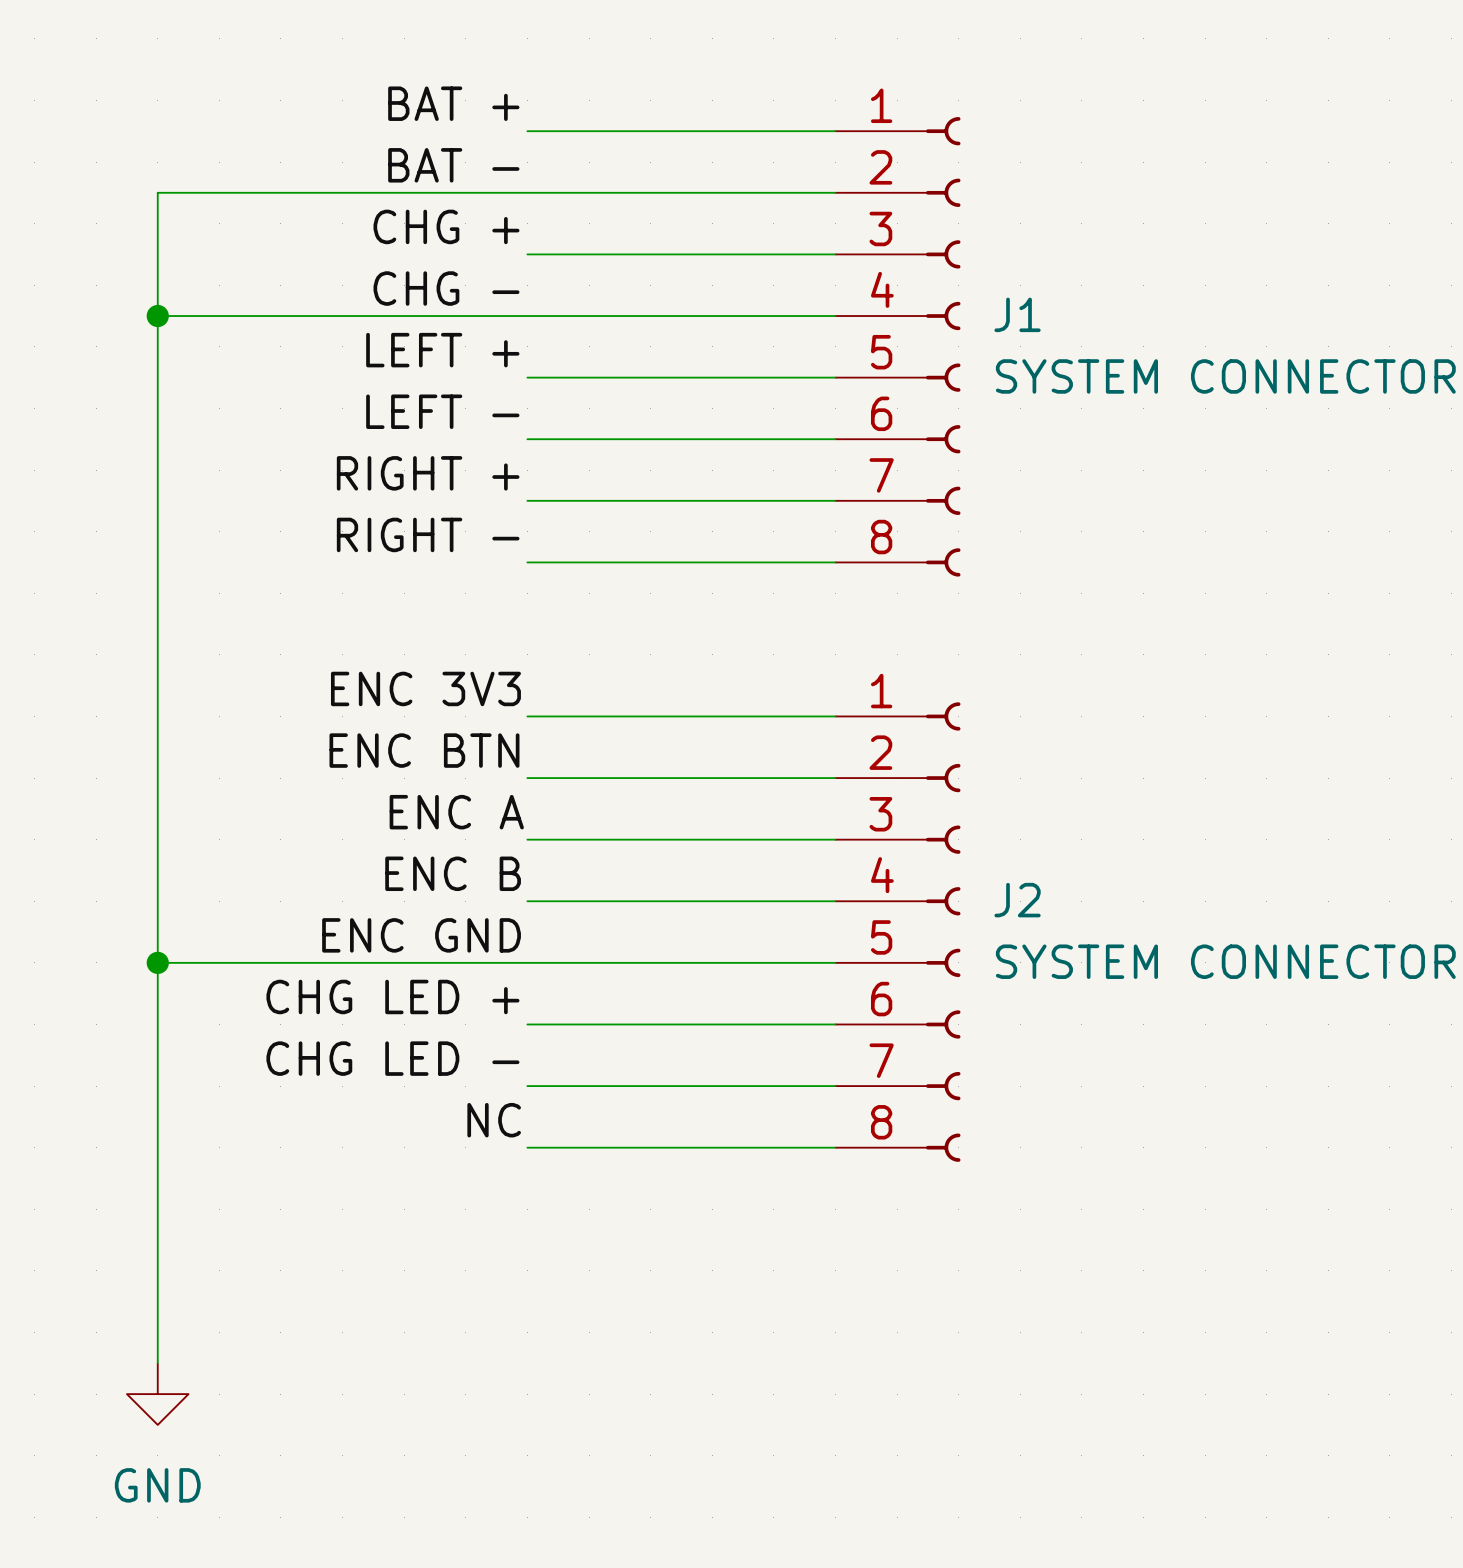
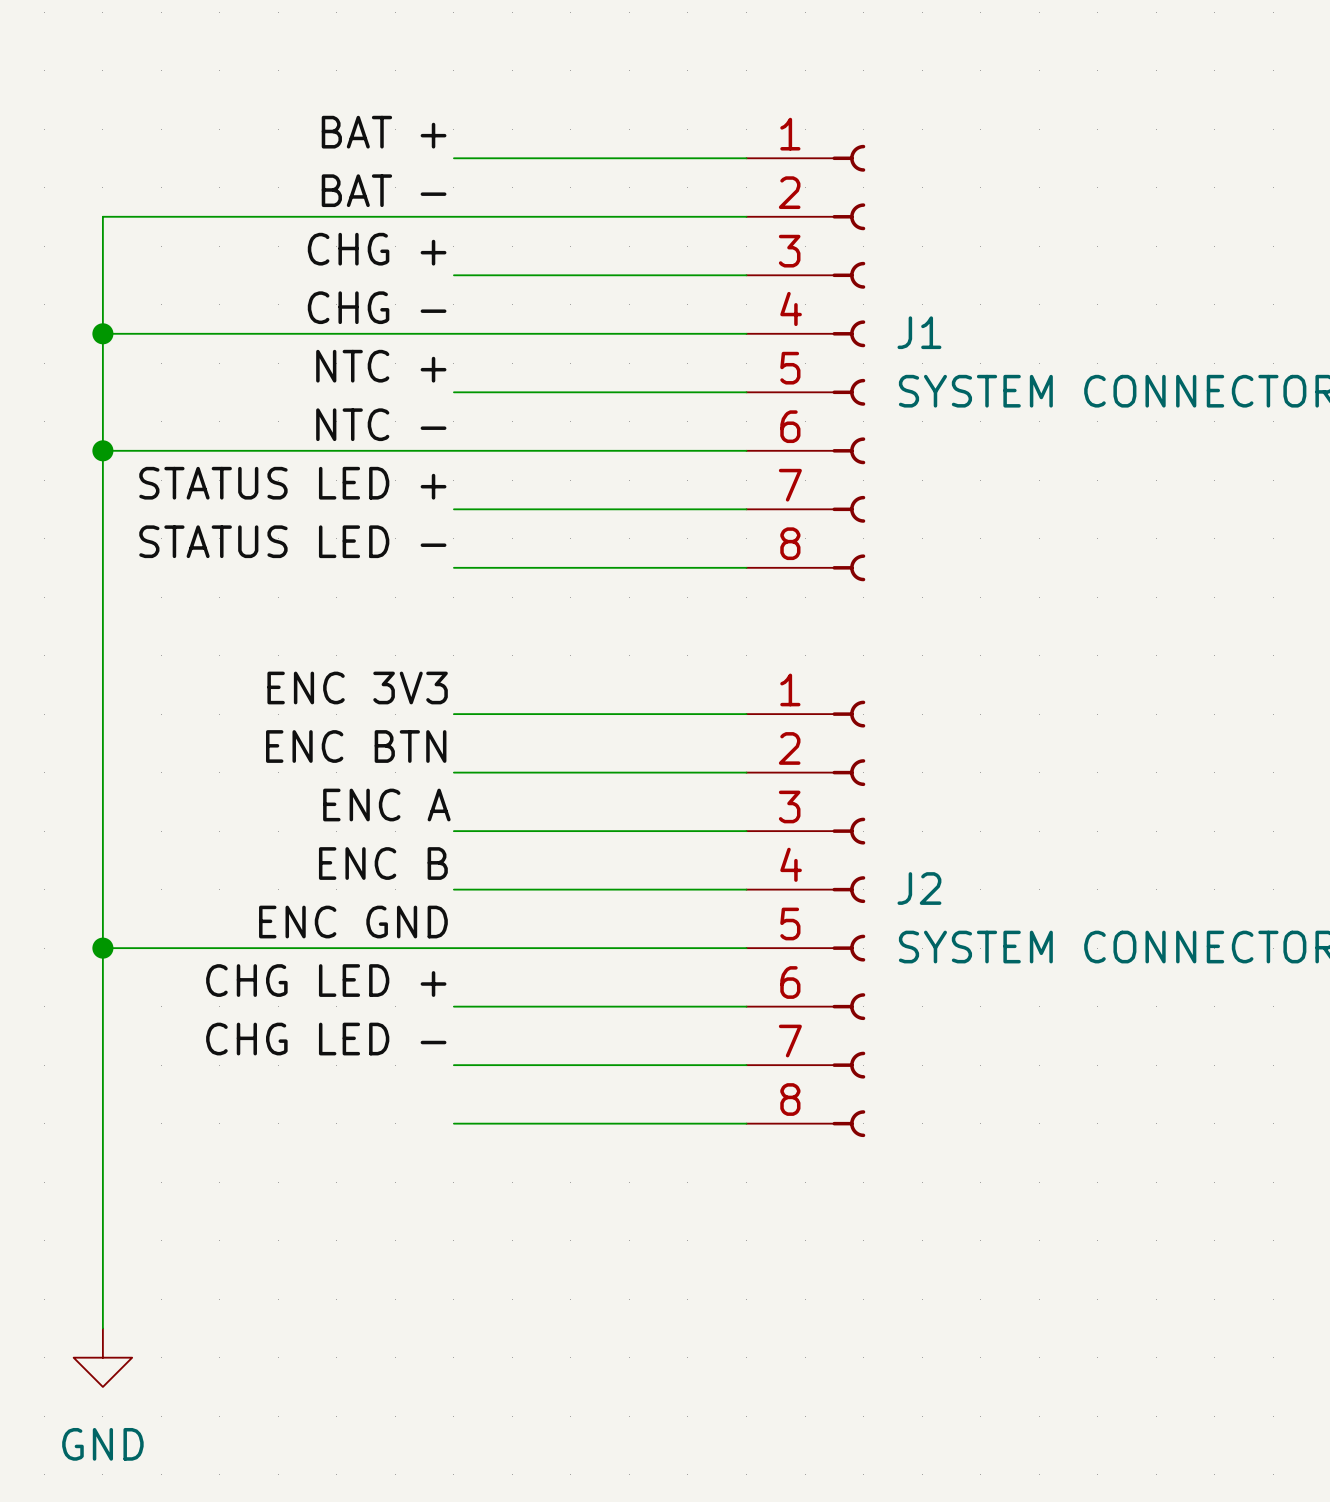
label: LEFT + (442, 350) -> NTC + (381, 366)
label: LEFT - (442, 411) -> NTC - (381, 424)
wire: none -> (102, 450) (453, 450)
junction: none -> (102, 450)
label: RIGHT + (428, 473) -> STATUS LED + (292, 483)
label: RIGHT - (428, 534) -> STATUS LED - (292, 541)
label: NC (494, 1120) -> none

